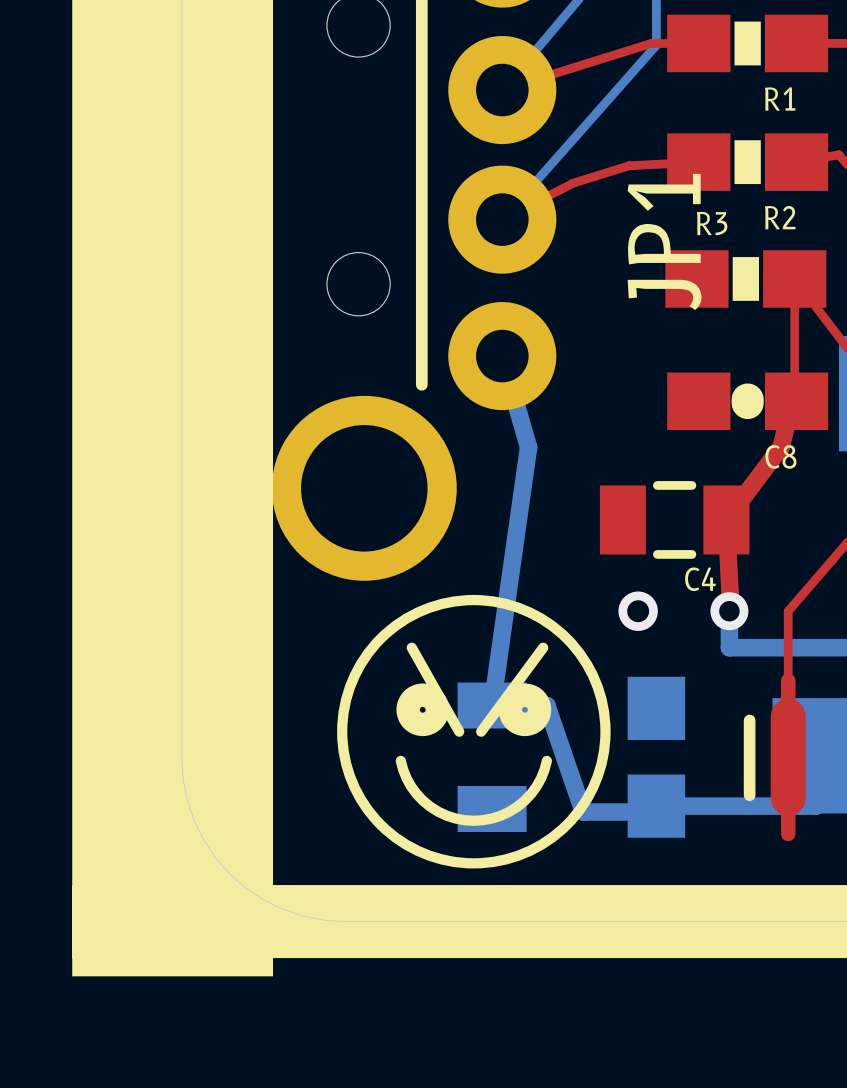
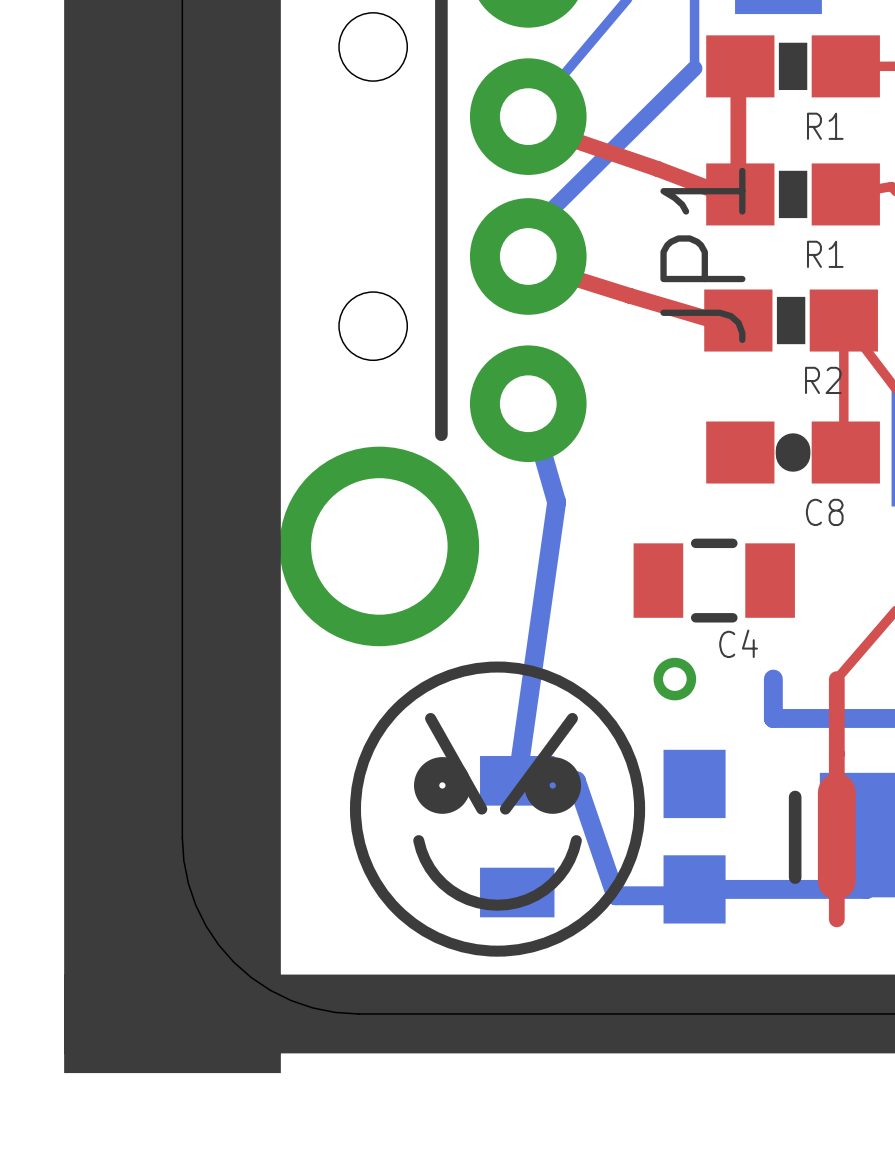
top track: (698, 43) (651, 43) (502, 90) -> none
bottom track: (656, 45) (502, 219) -> (694, 68) (504, 256)
top track: none -> (738, 68) (738, 200) (740, 200) (657, 168) (504, 116)
top track: (698, 162) (629, 165) (573, 183) (502, 219) -> none
R2 name: R2 (780, 217) -> R1 (825, 254)
top track: none -> (504, 256) (740, 328)
R3 name: R3 (712, 223) -> R2 (823, 380)
top track: (796, 401) (794, 392) (781, 446) (726, 519) (729, 611) -> none
via: (729, 611) -> none
top track width: thin (788, 611) (788, 680) -> thick (836, 679) (836, 753)

